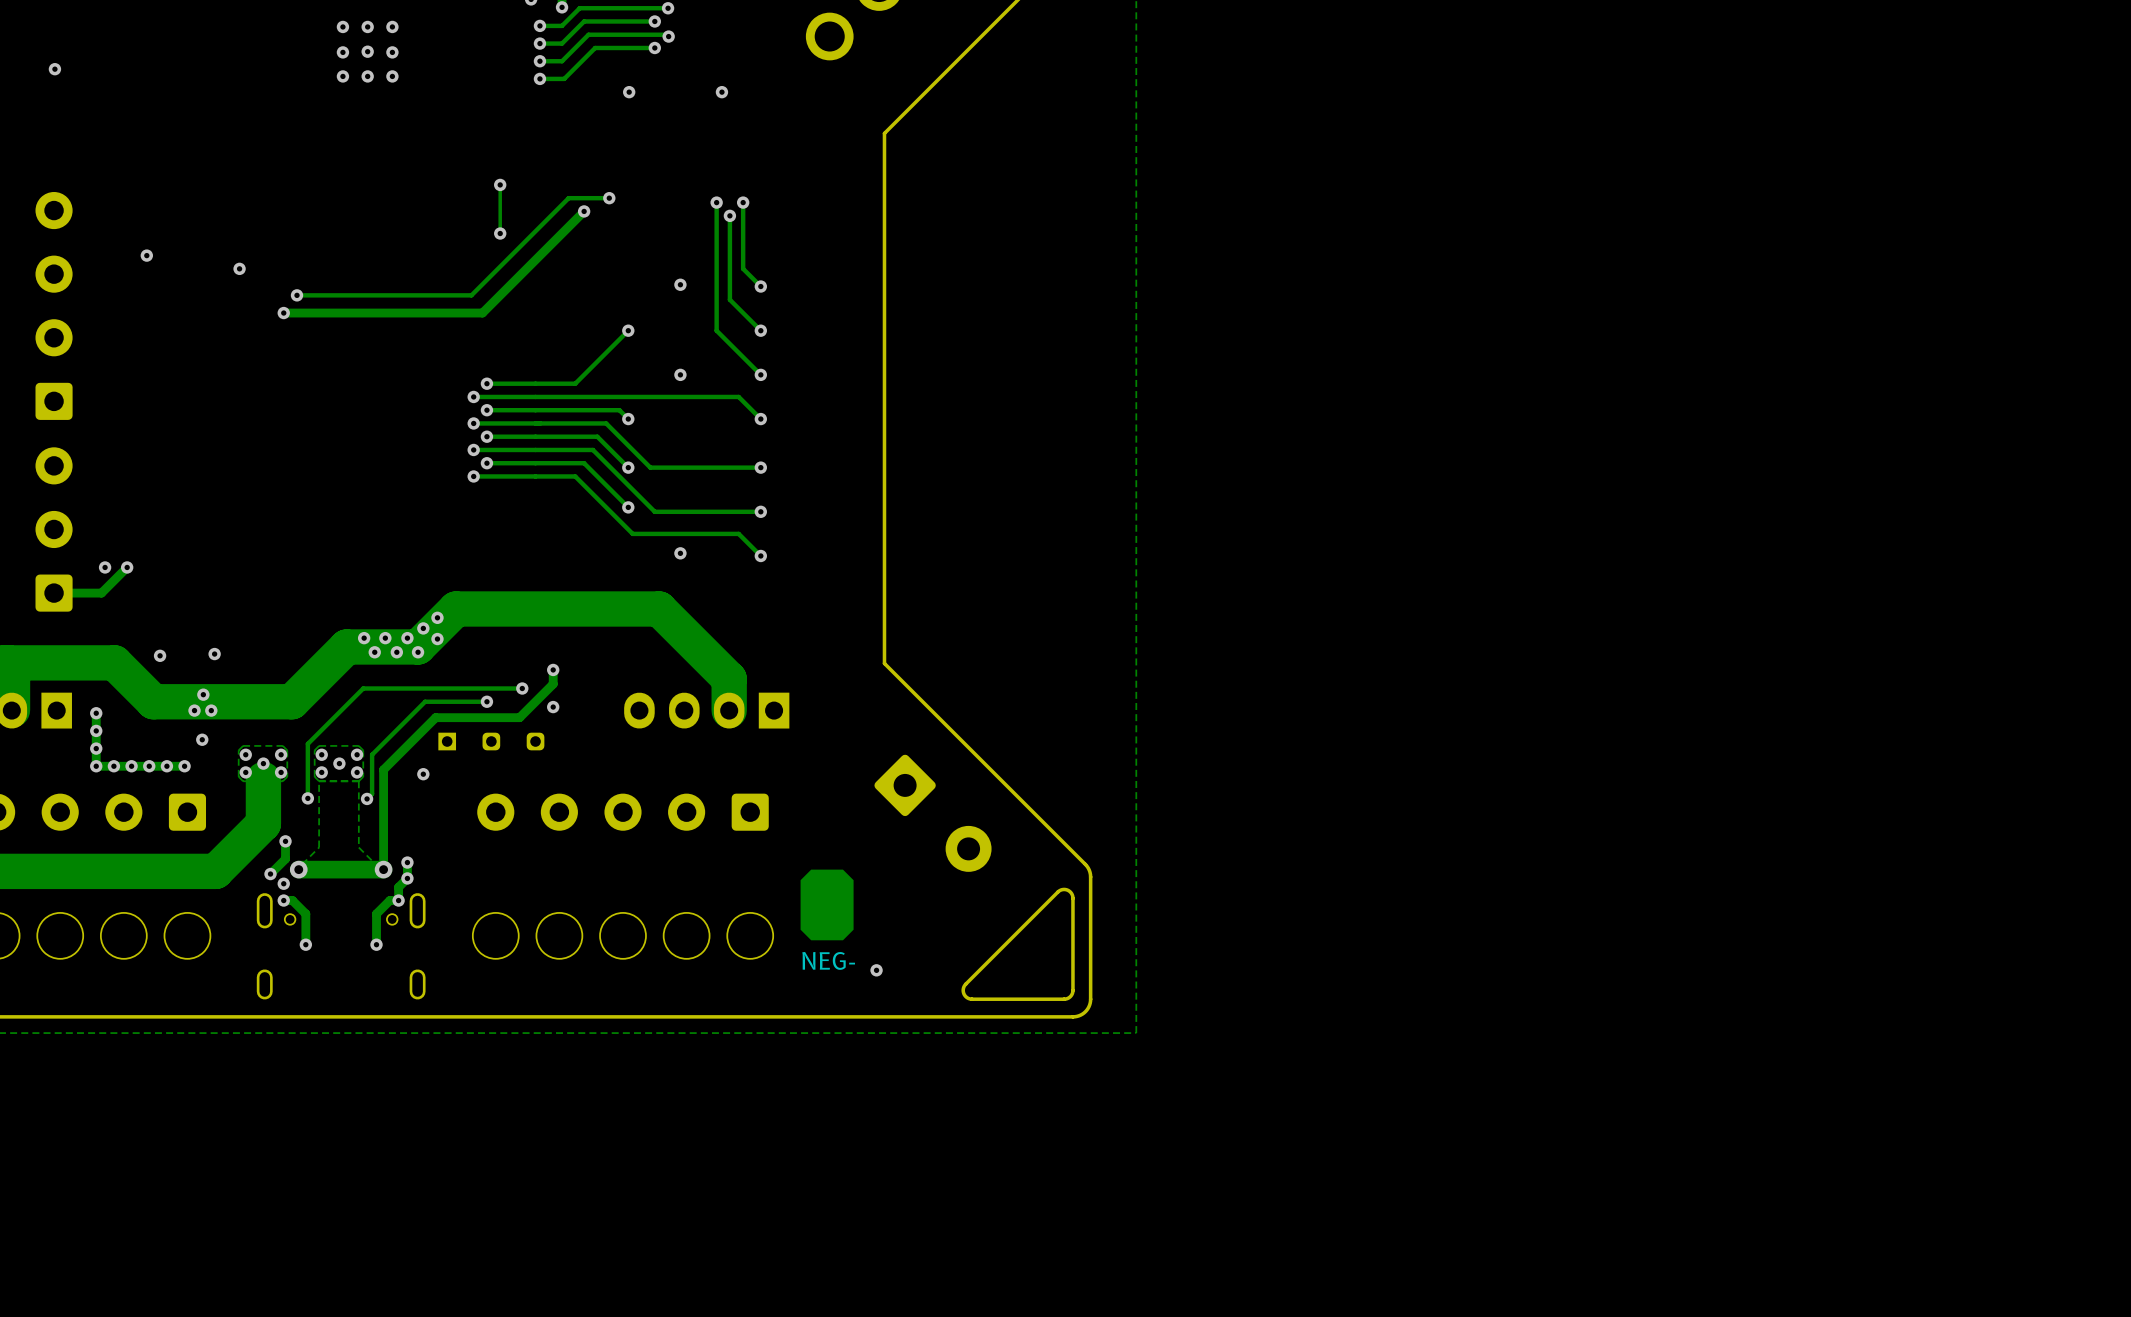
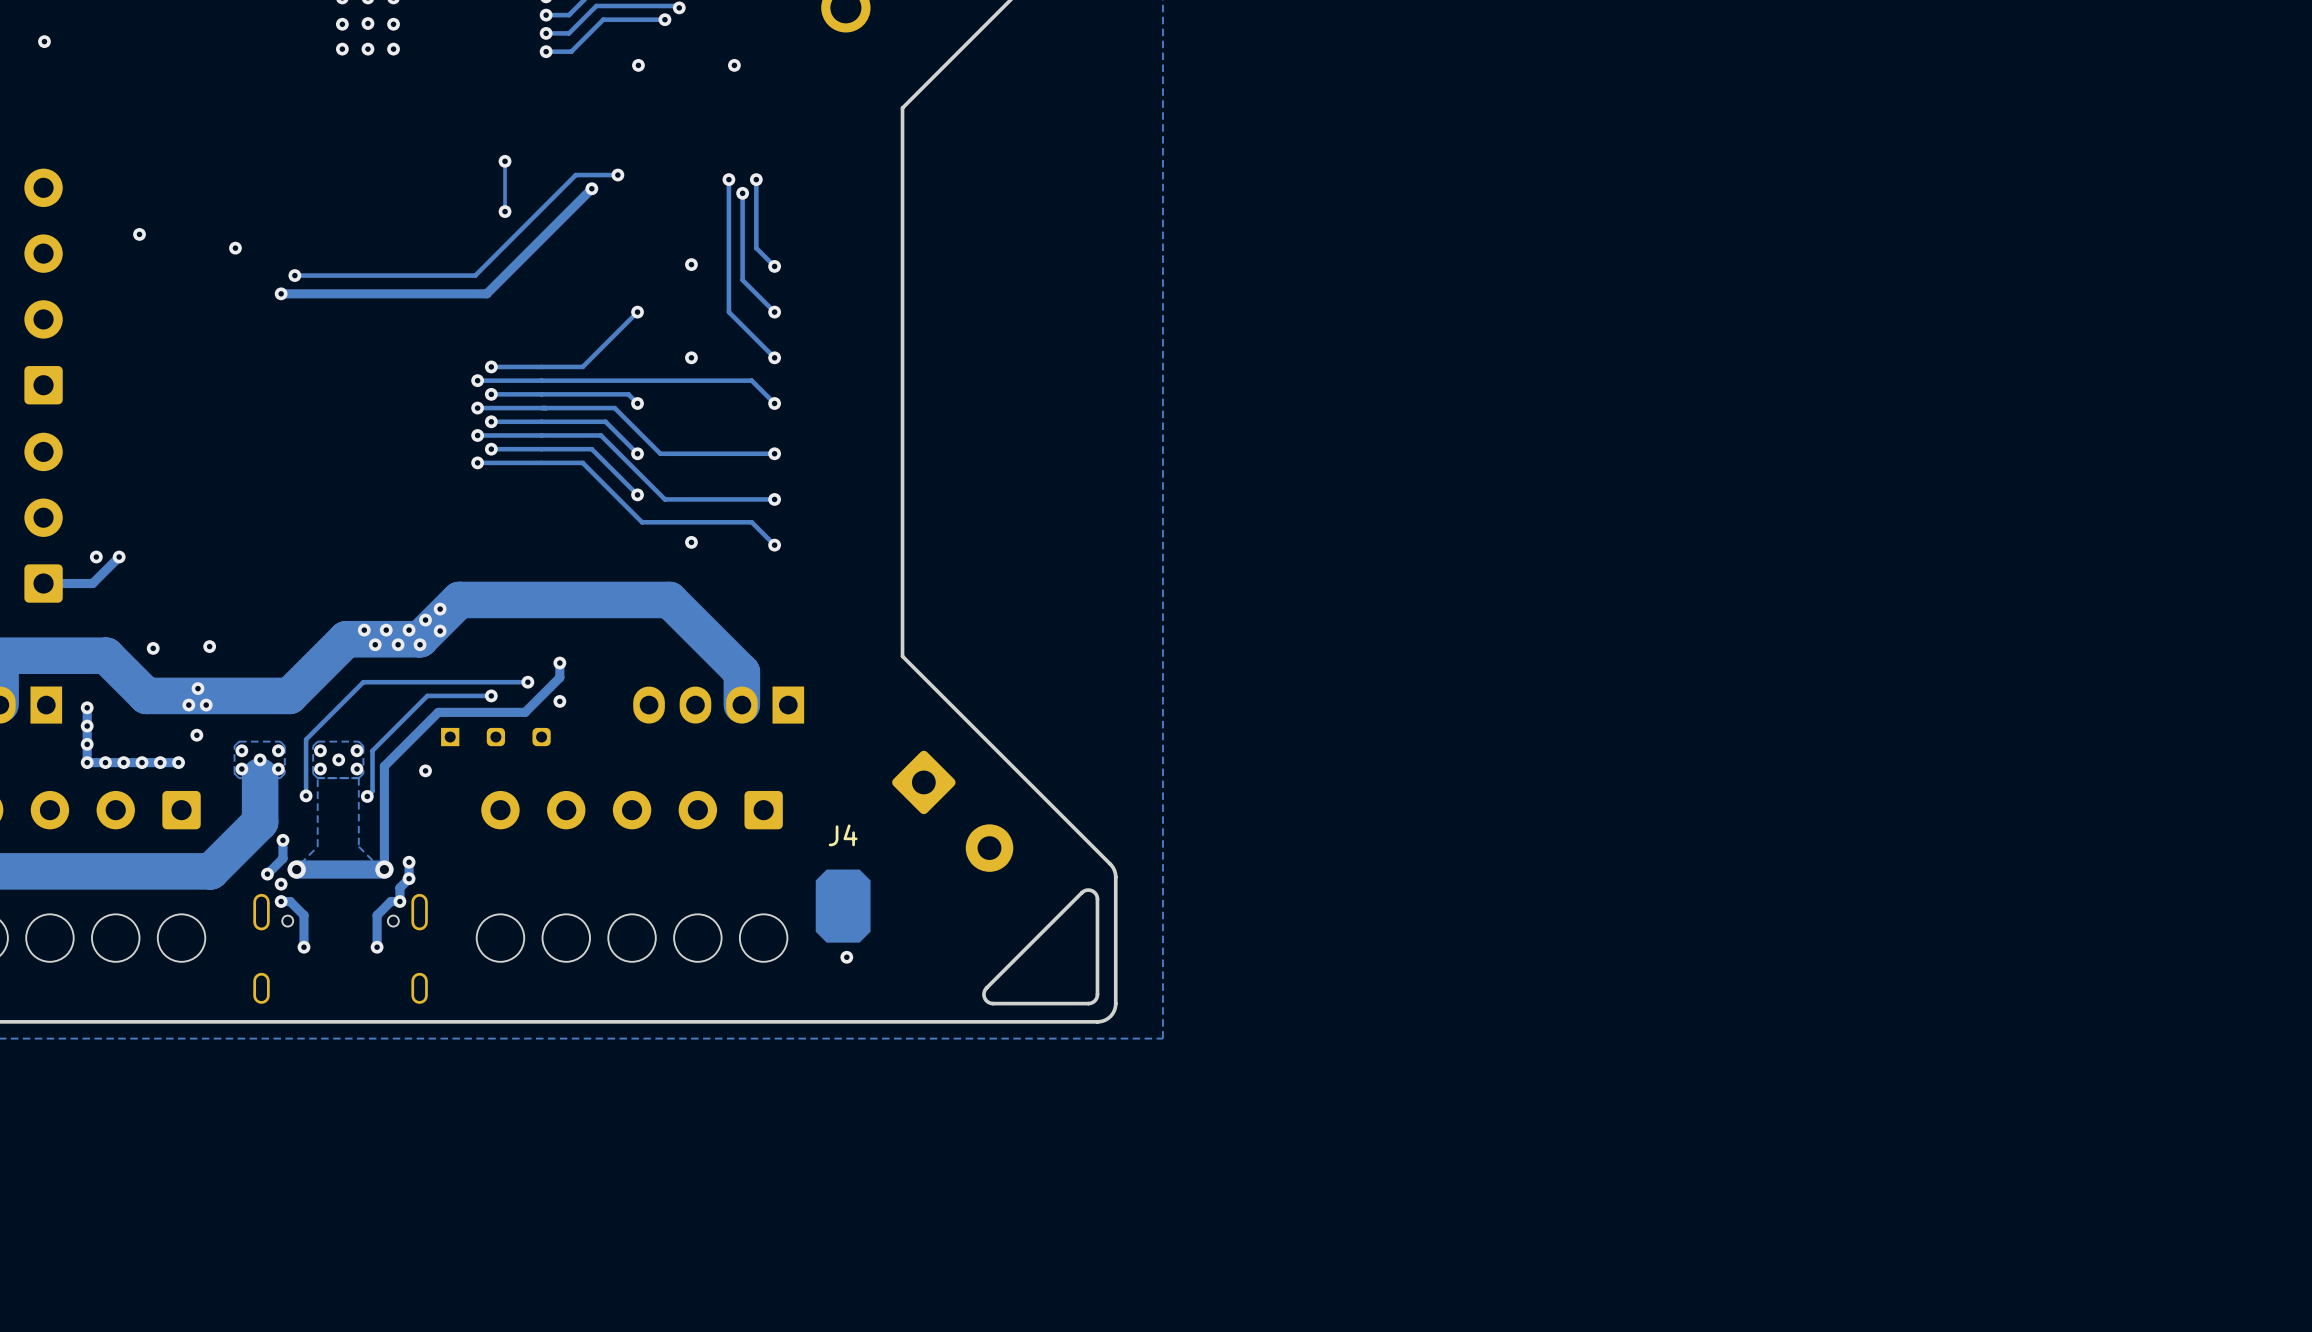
J4 name: none -> J4 (843, 835)
text: NEG- (828, 960) -> none
via position: (876, 970) -> (846, 957)

